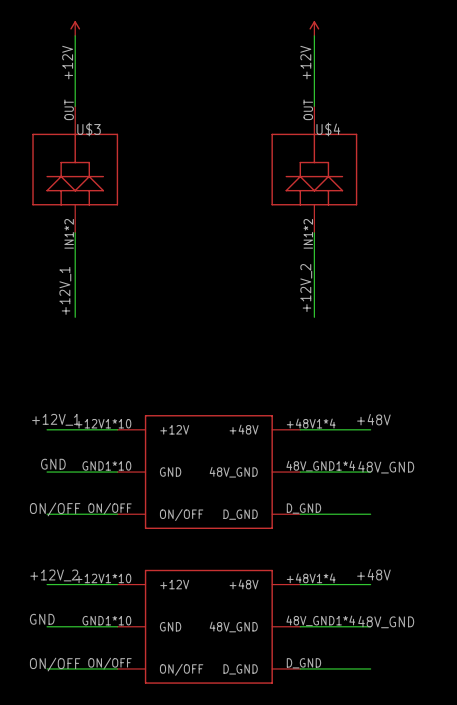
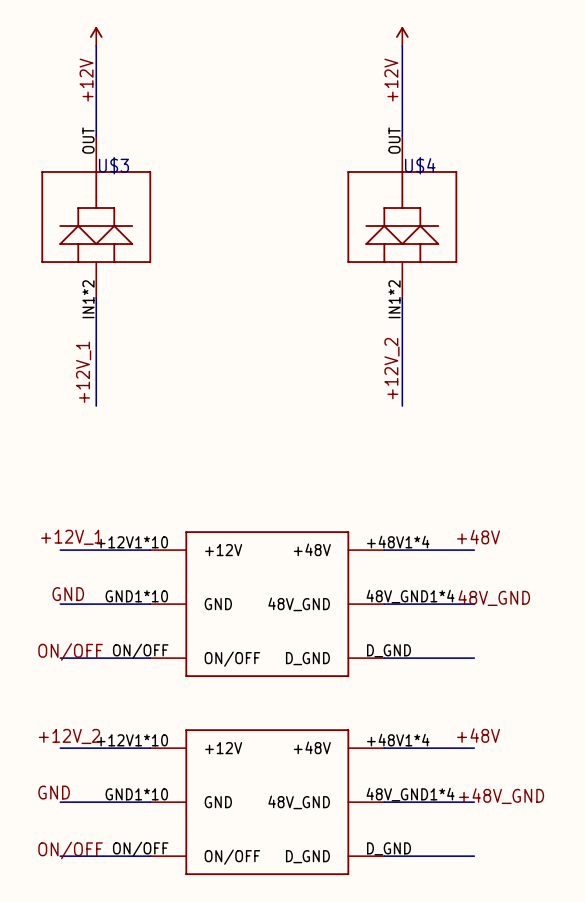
label: 48V_GND (386, 622) -> +48V_GND (501, 796)

